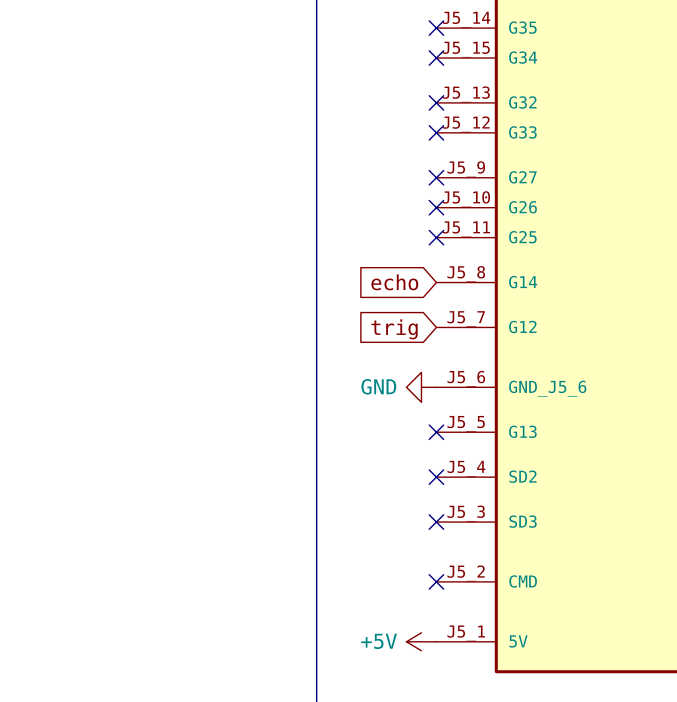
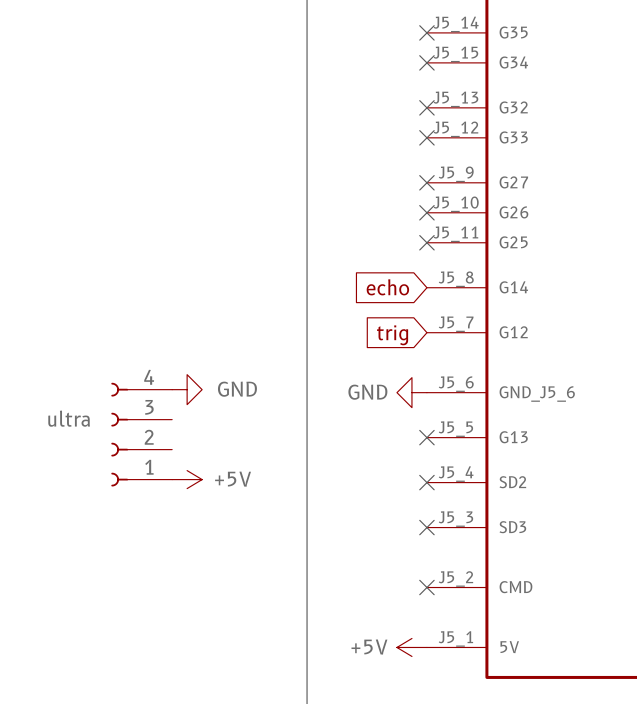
power symbol: none -> GND (187, 389)
part: none -> ultra (141, 434)
power symbol: none -> +5V (187, 479)

